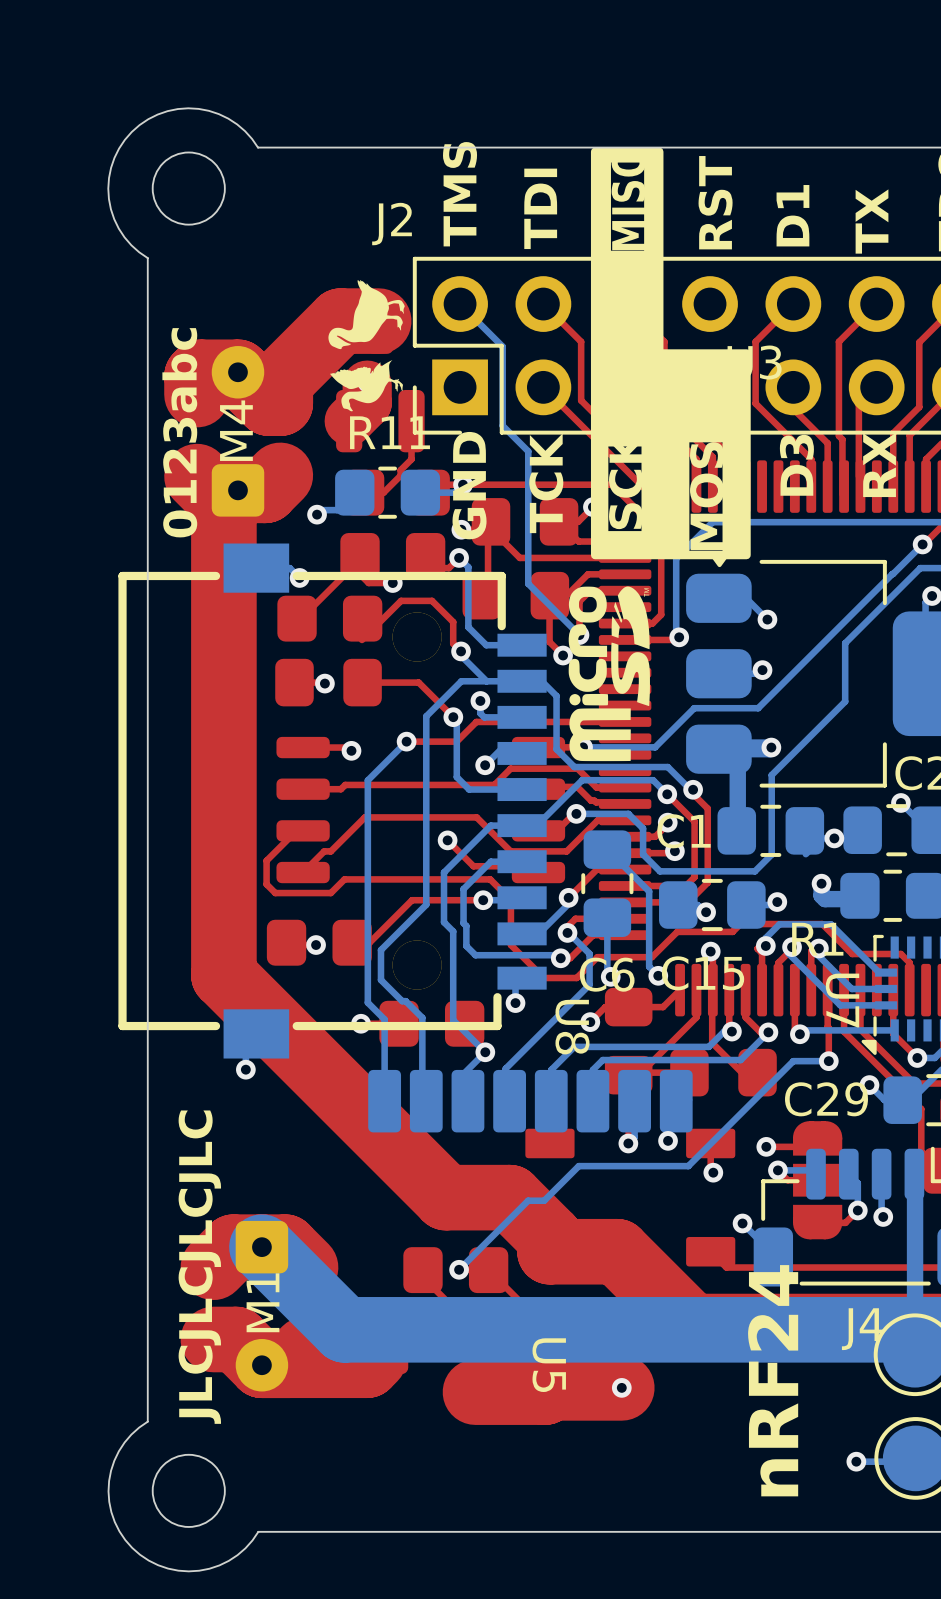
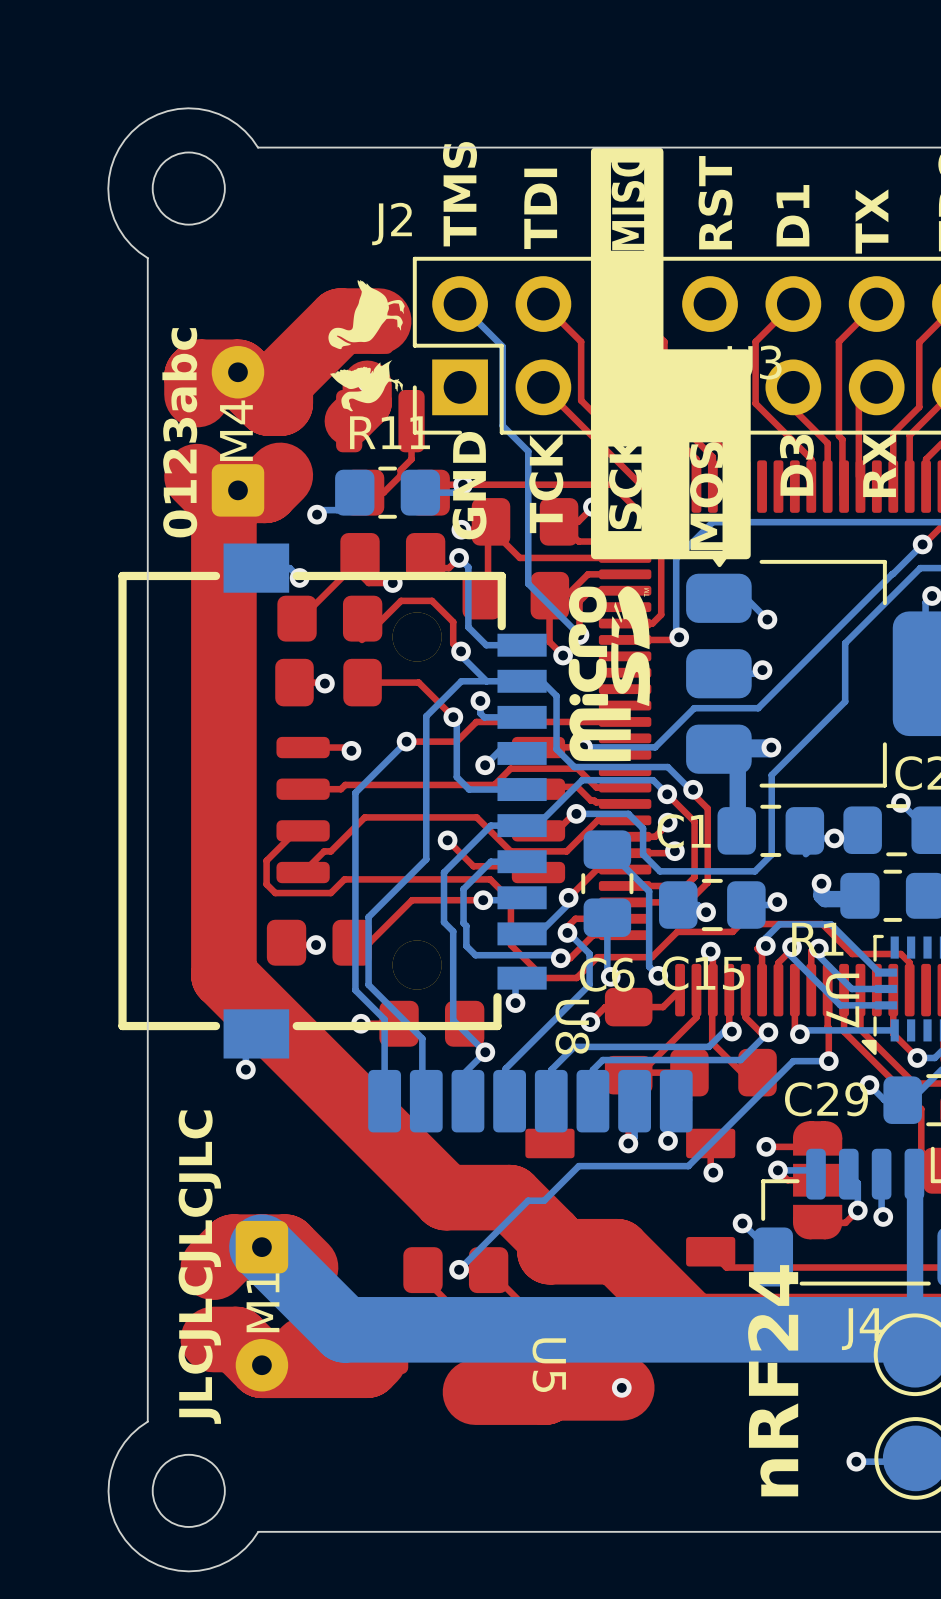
bottom track: (367, 780) (367, 1002) -> (367, 780) (355, 792) (355, 990) (367, 1002)
bottom track: (426, 859) (426, 904) (380, 950) (380, 979) (422, 1017) (422, 1038) -> (426, 859) (368, 917) (368, 984) (422, 1038)

